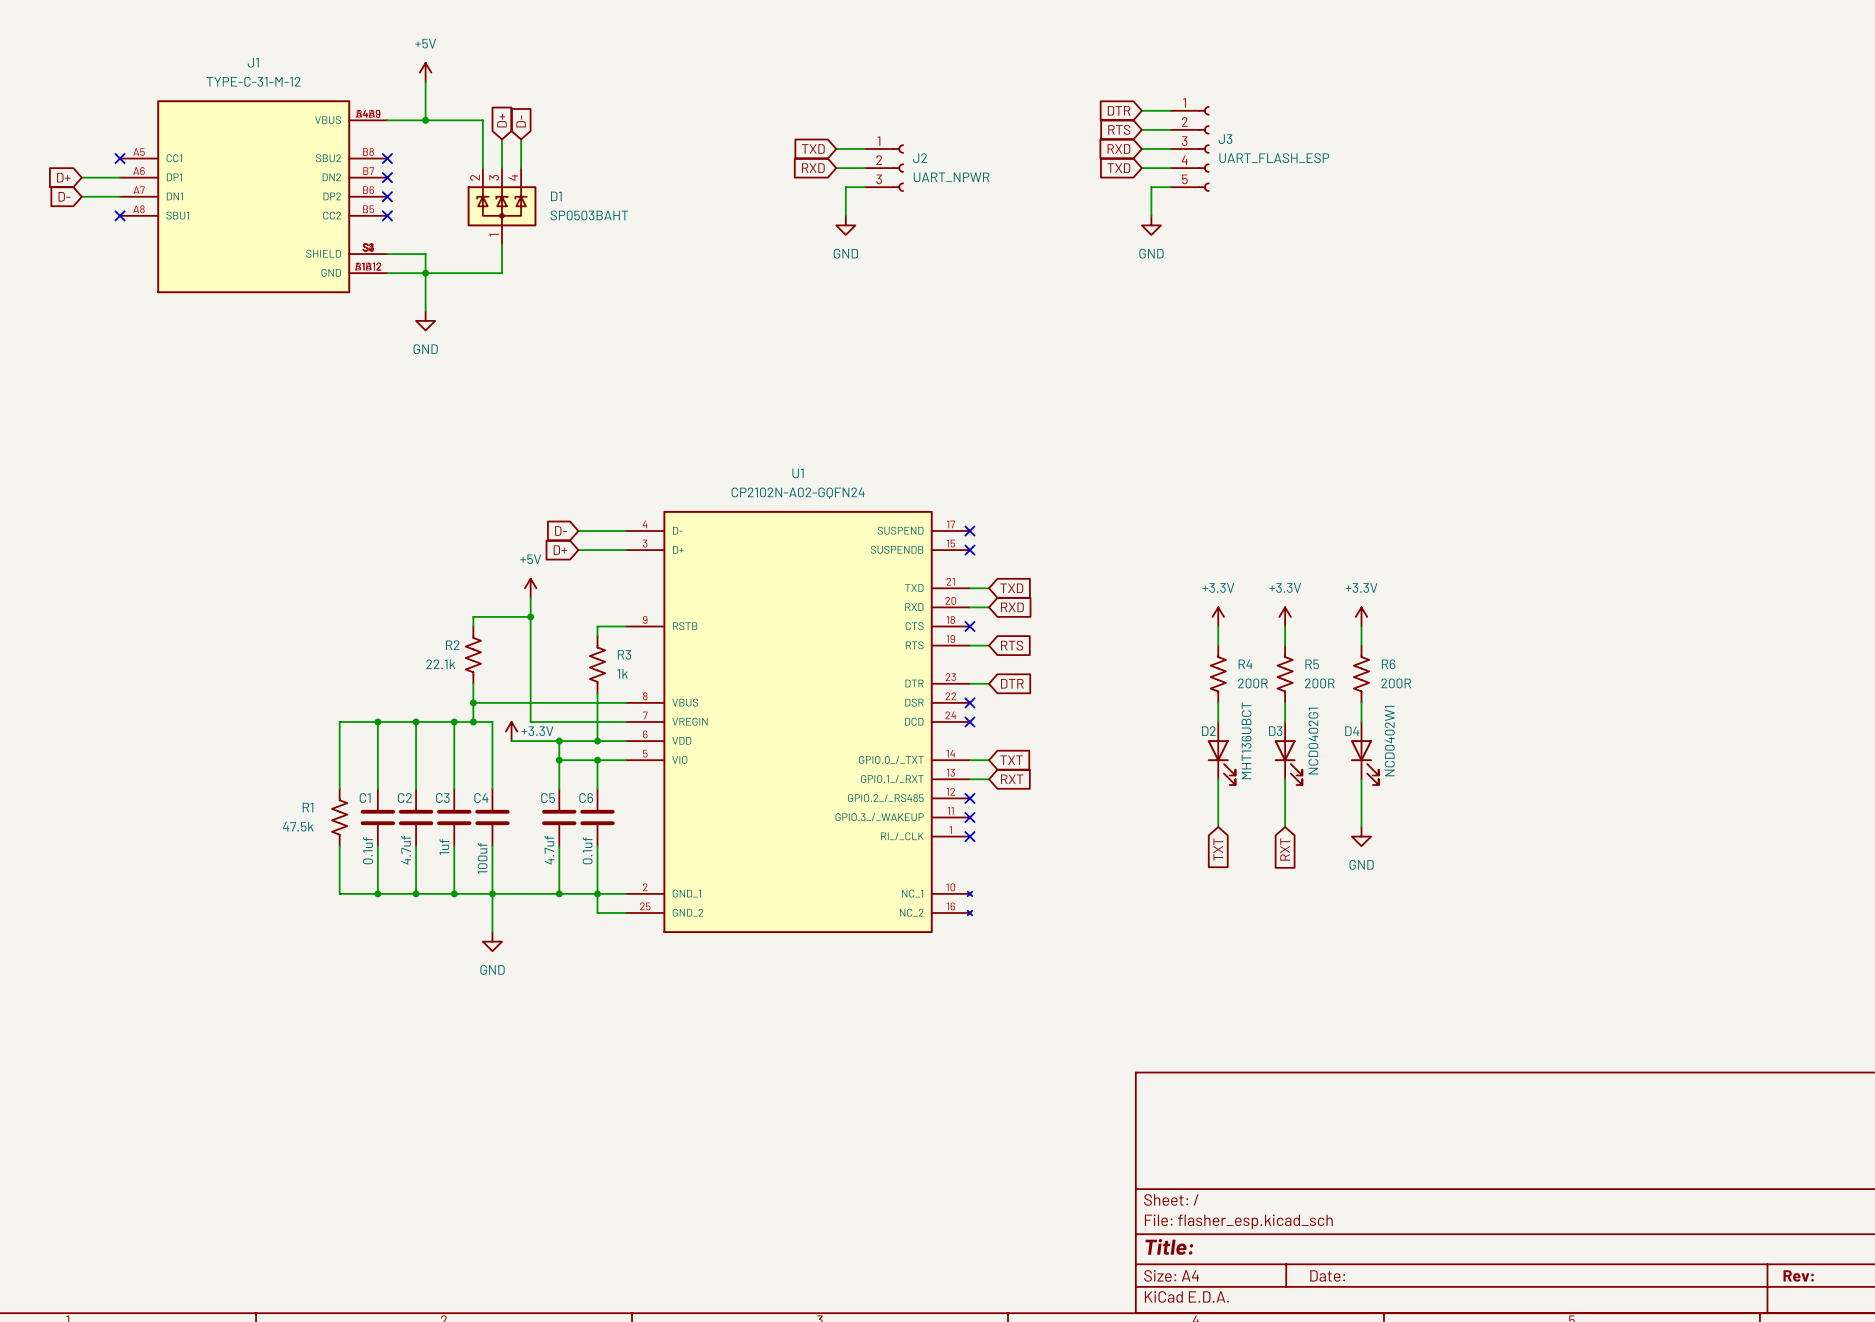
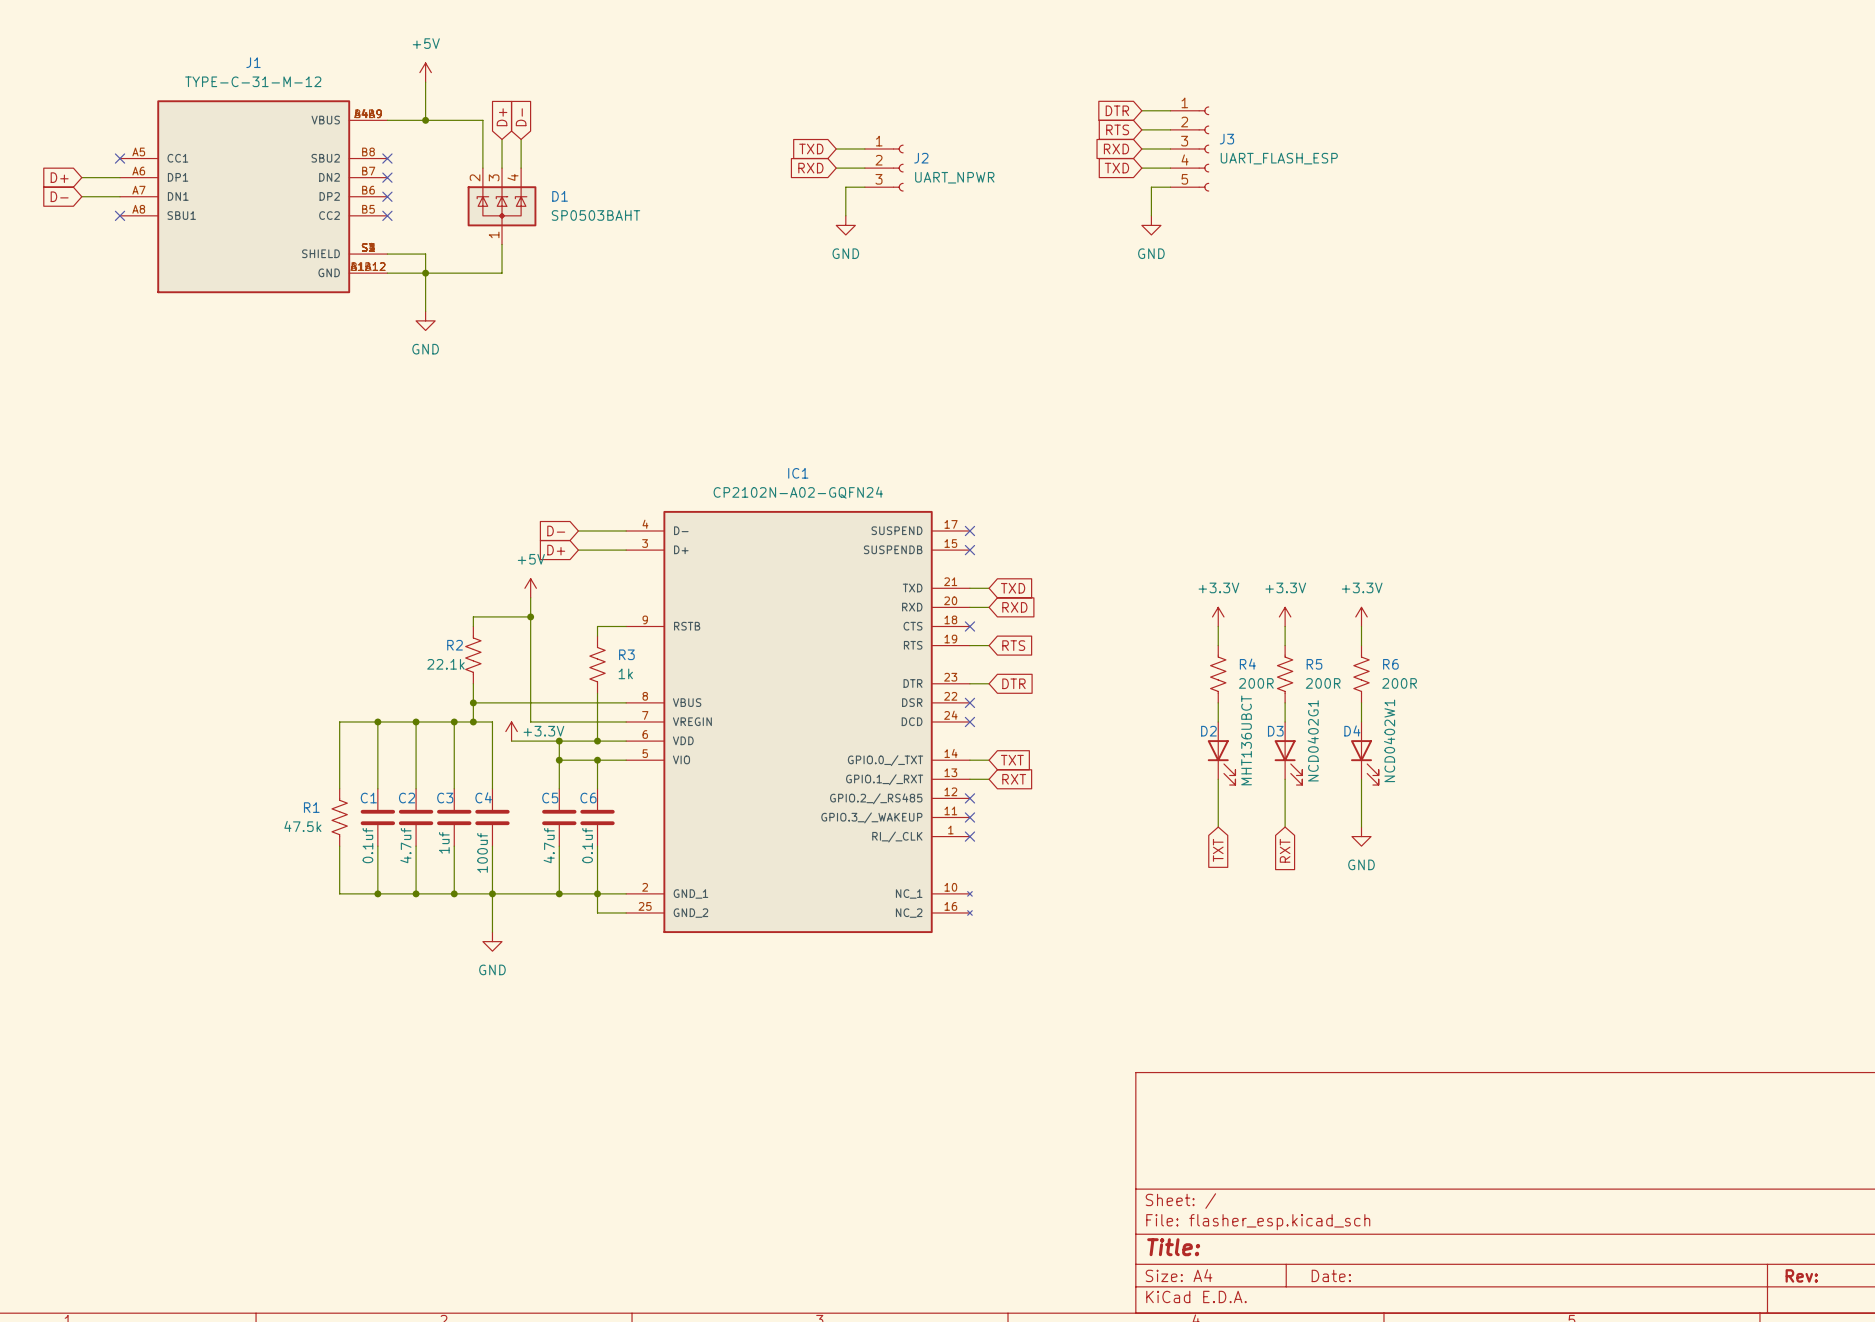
U1 name: U1 (798, 473) -> IC1 (798, 473)

